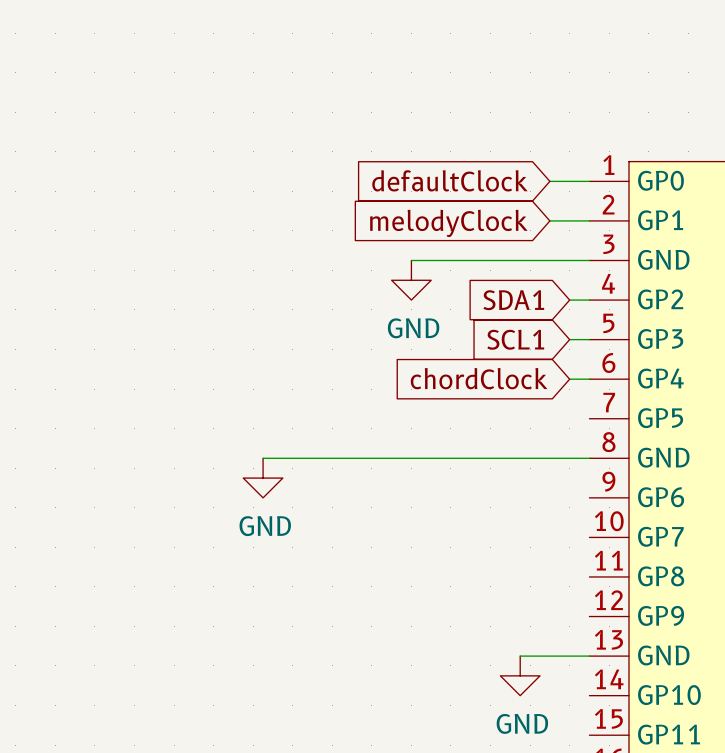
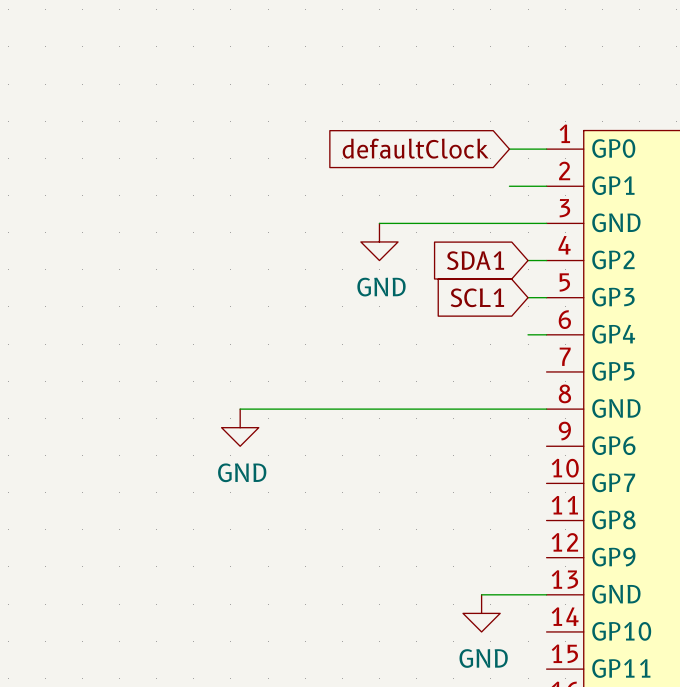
global label: melodyClock (448, 223) -> none
global label: chordClock (479, 378) -> none

